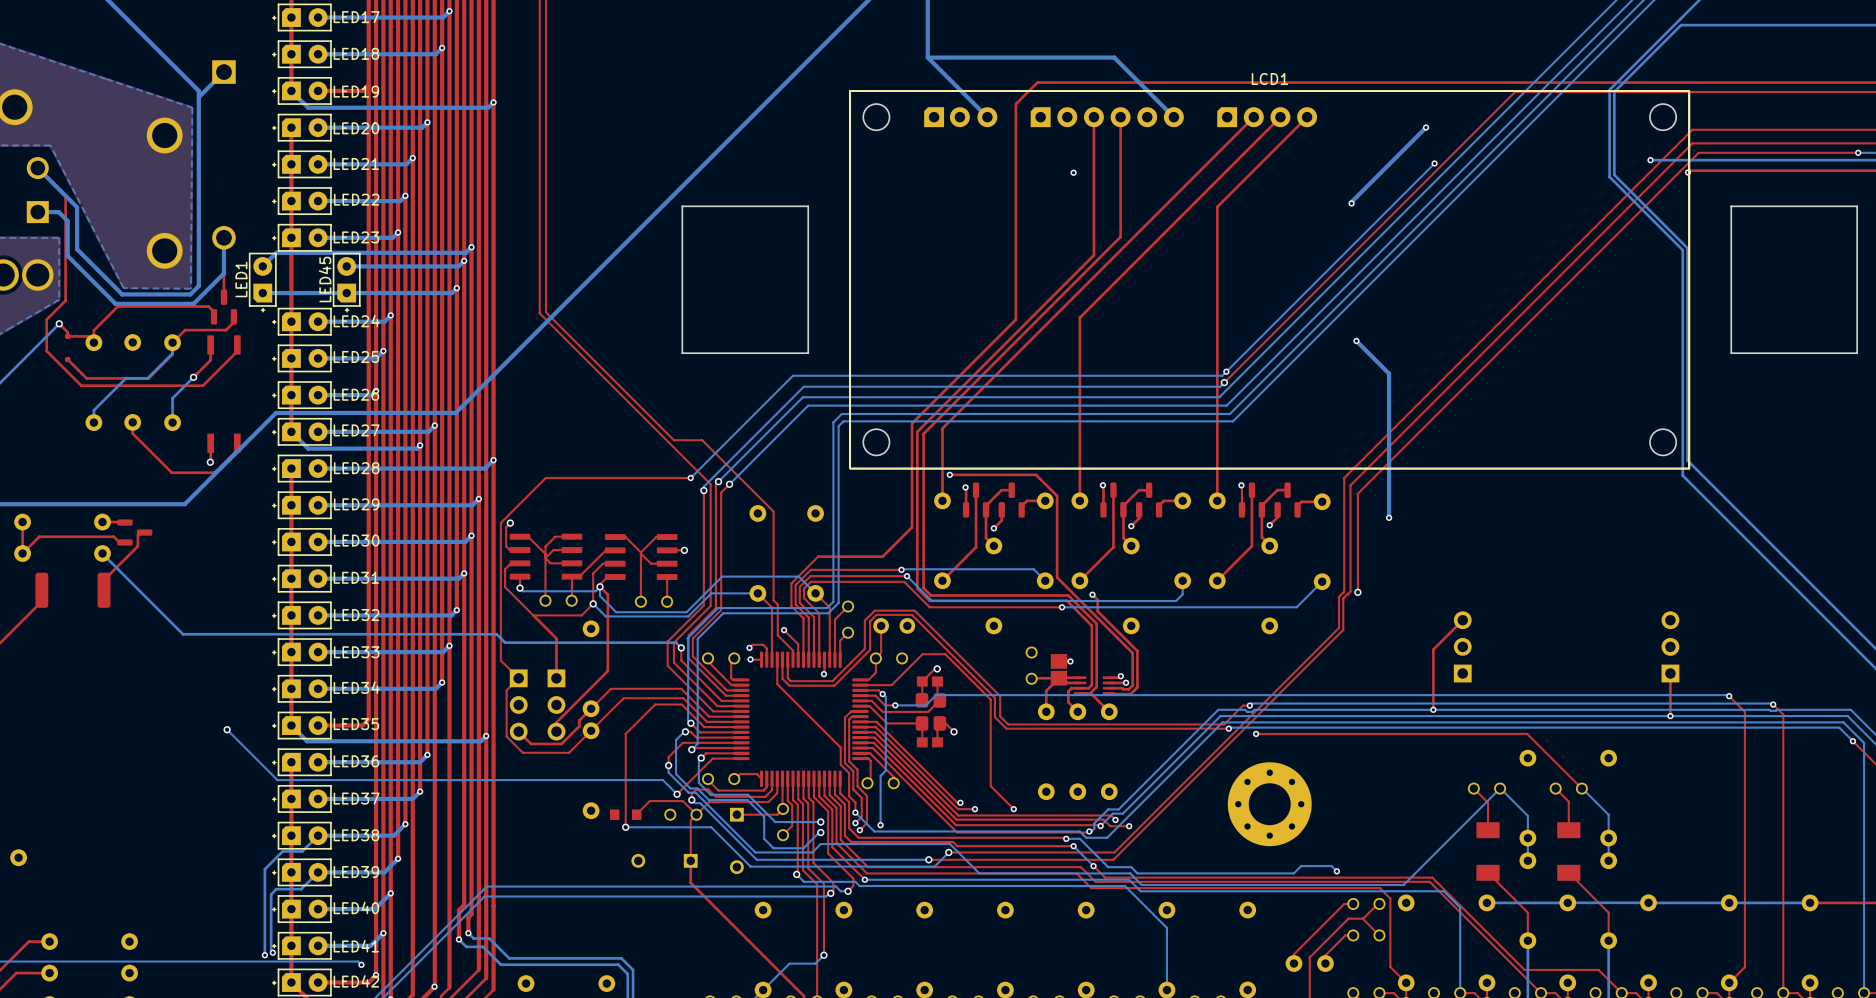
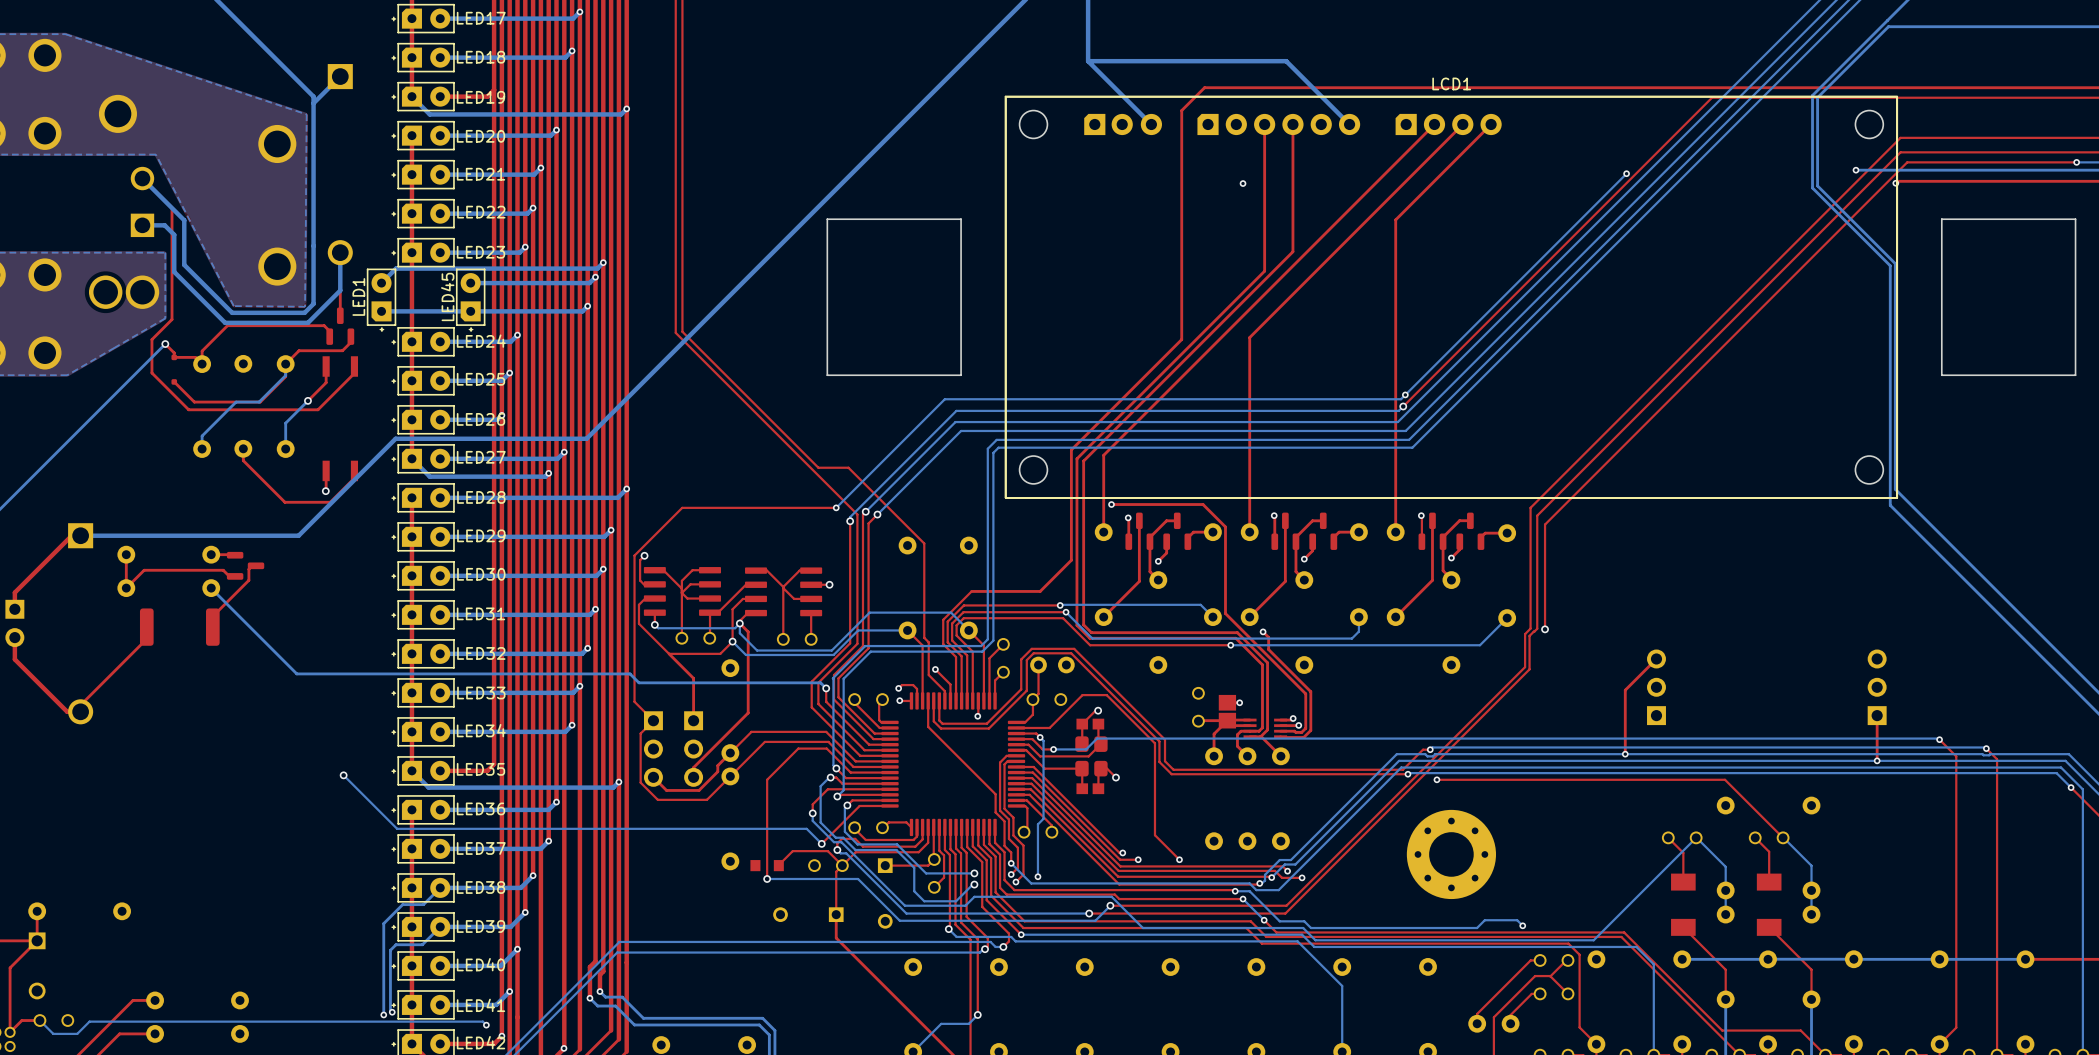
bottom track: (1426, 127) (1351, 203) -> none
via: (1426, 127) -> none
via: (1351, 203) -> none
bottom track: (1356, 340) (1389, 373) (1389, 517) -> none
via: (1356, 340) -> none
via: (1389, 517) -> none

